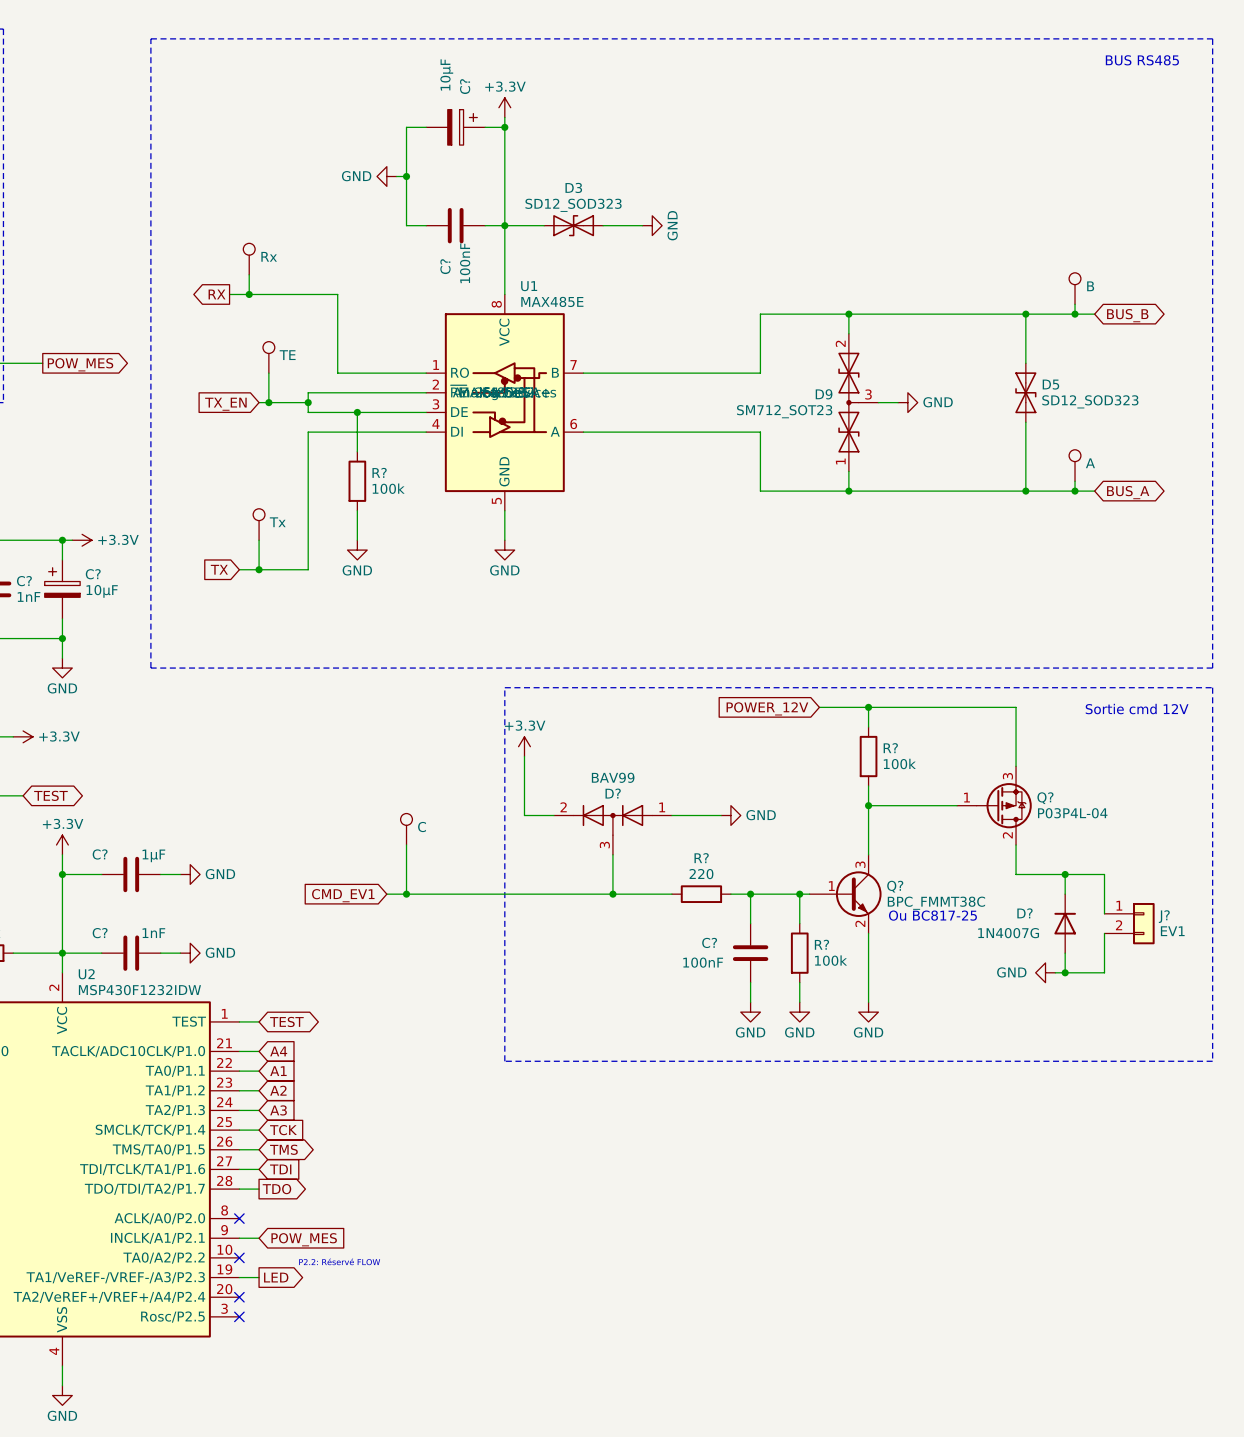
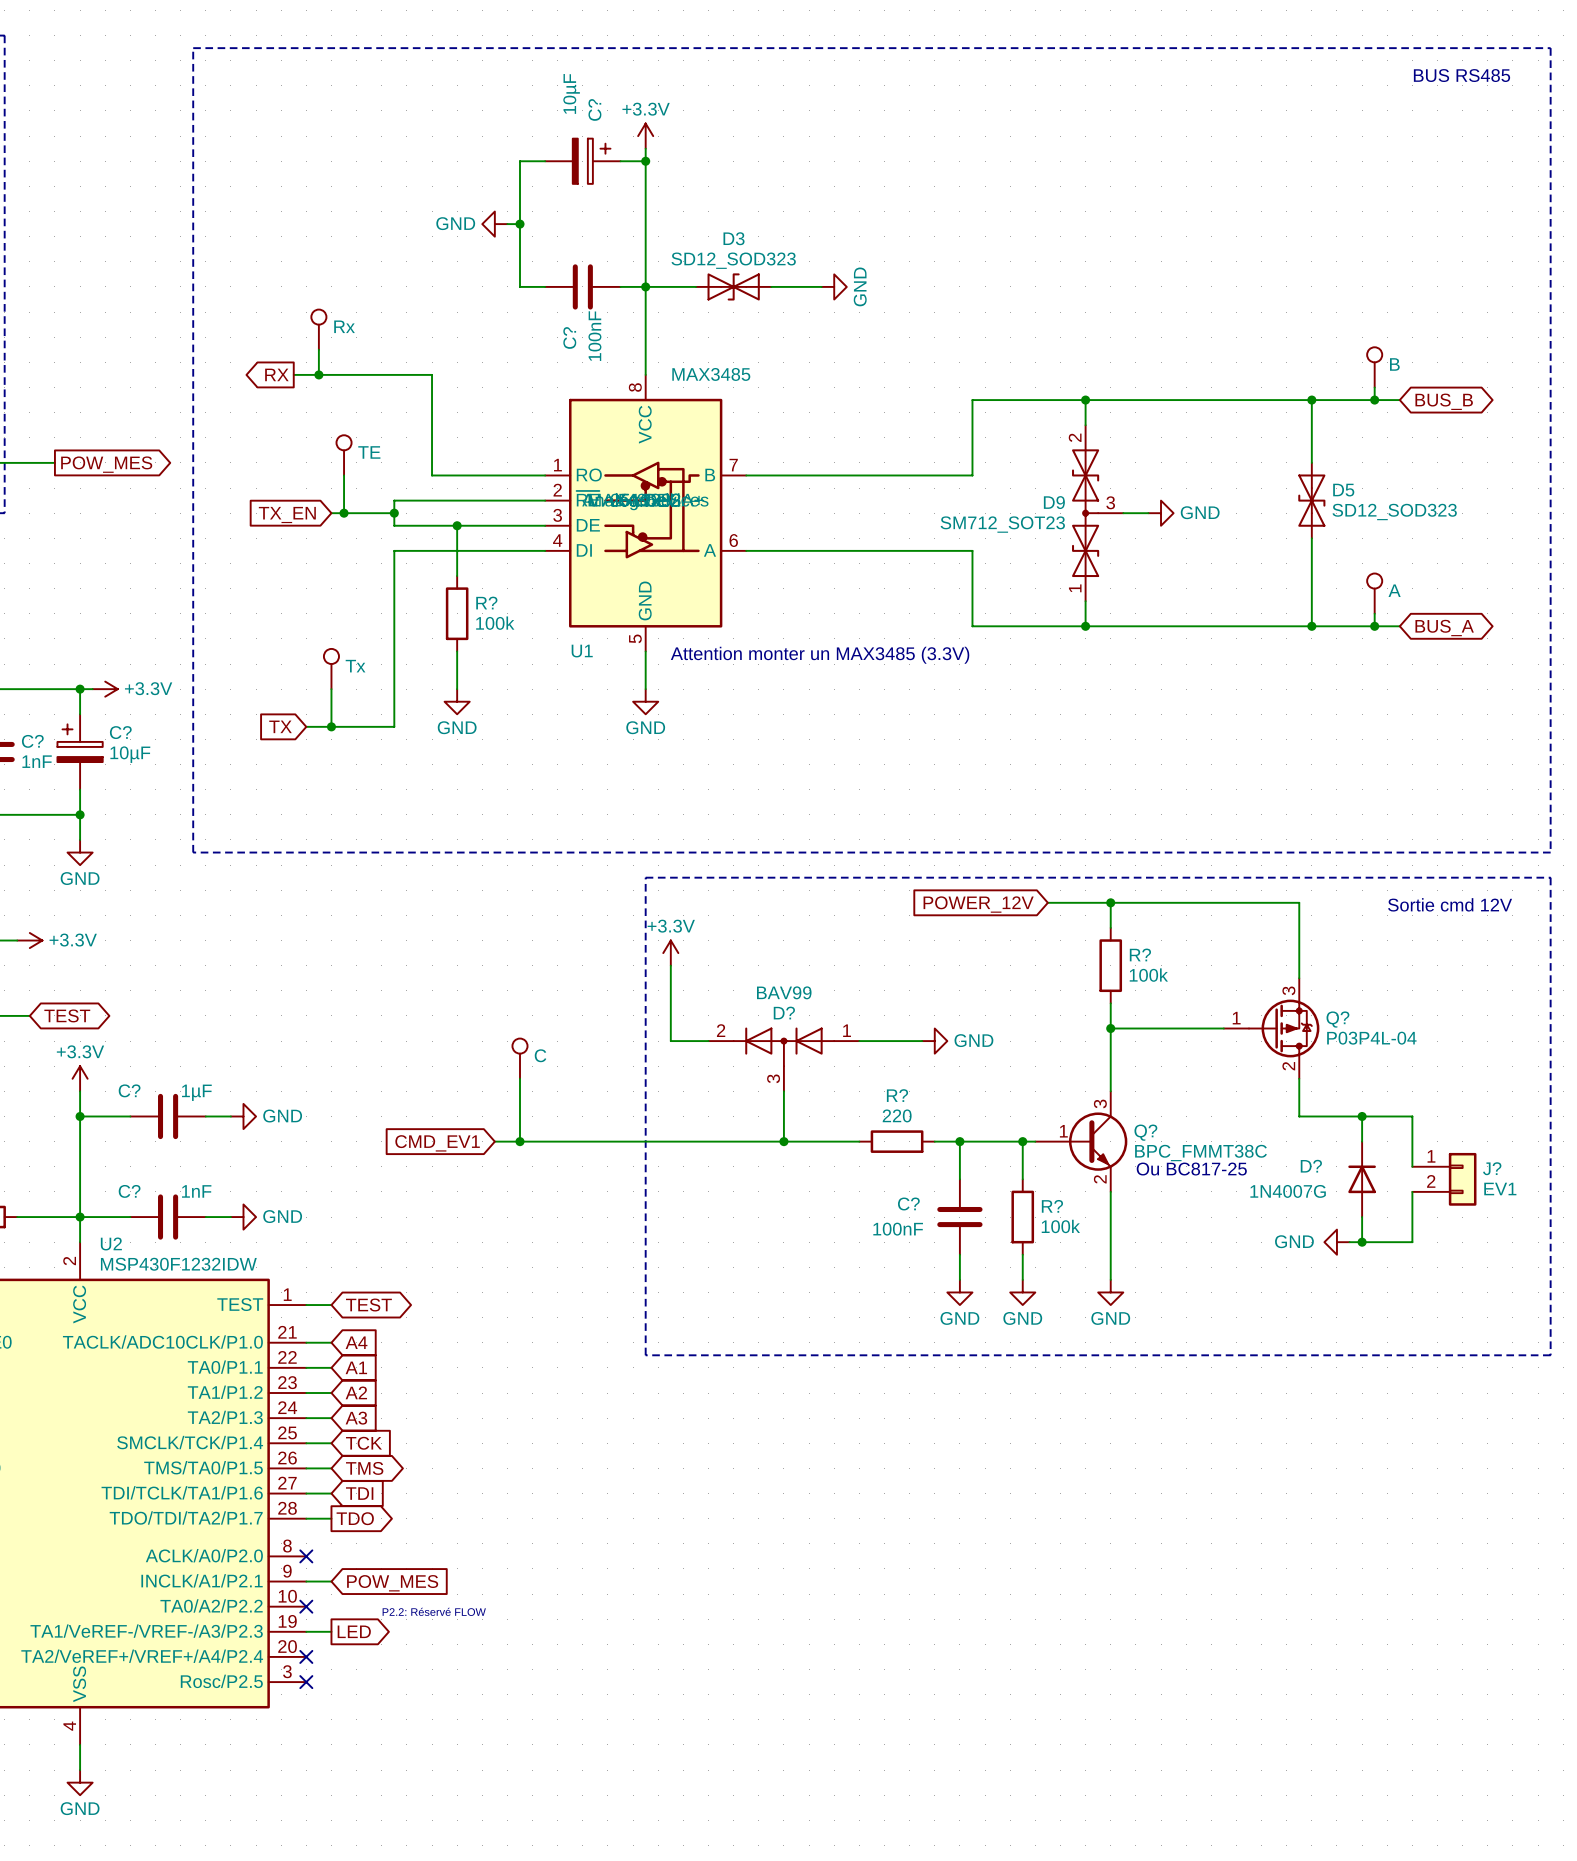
U1 name position: U1 (529, 286) -> U1 (582, 651)
U1 value: MAX485E (552, 301) -> MAX3485 (711, 374)
text: none -> Attention monter un MAX3485 (3.3V) (820, 655)

